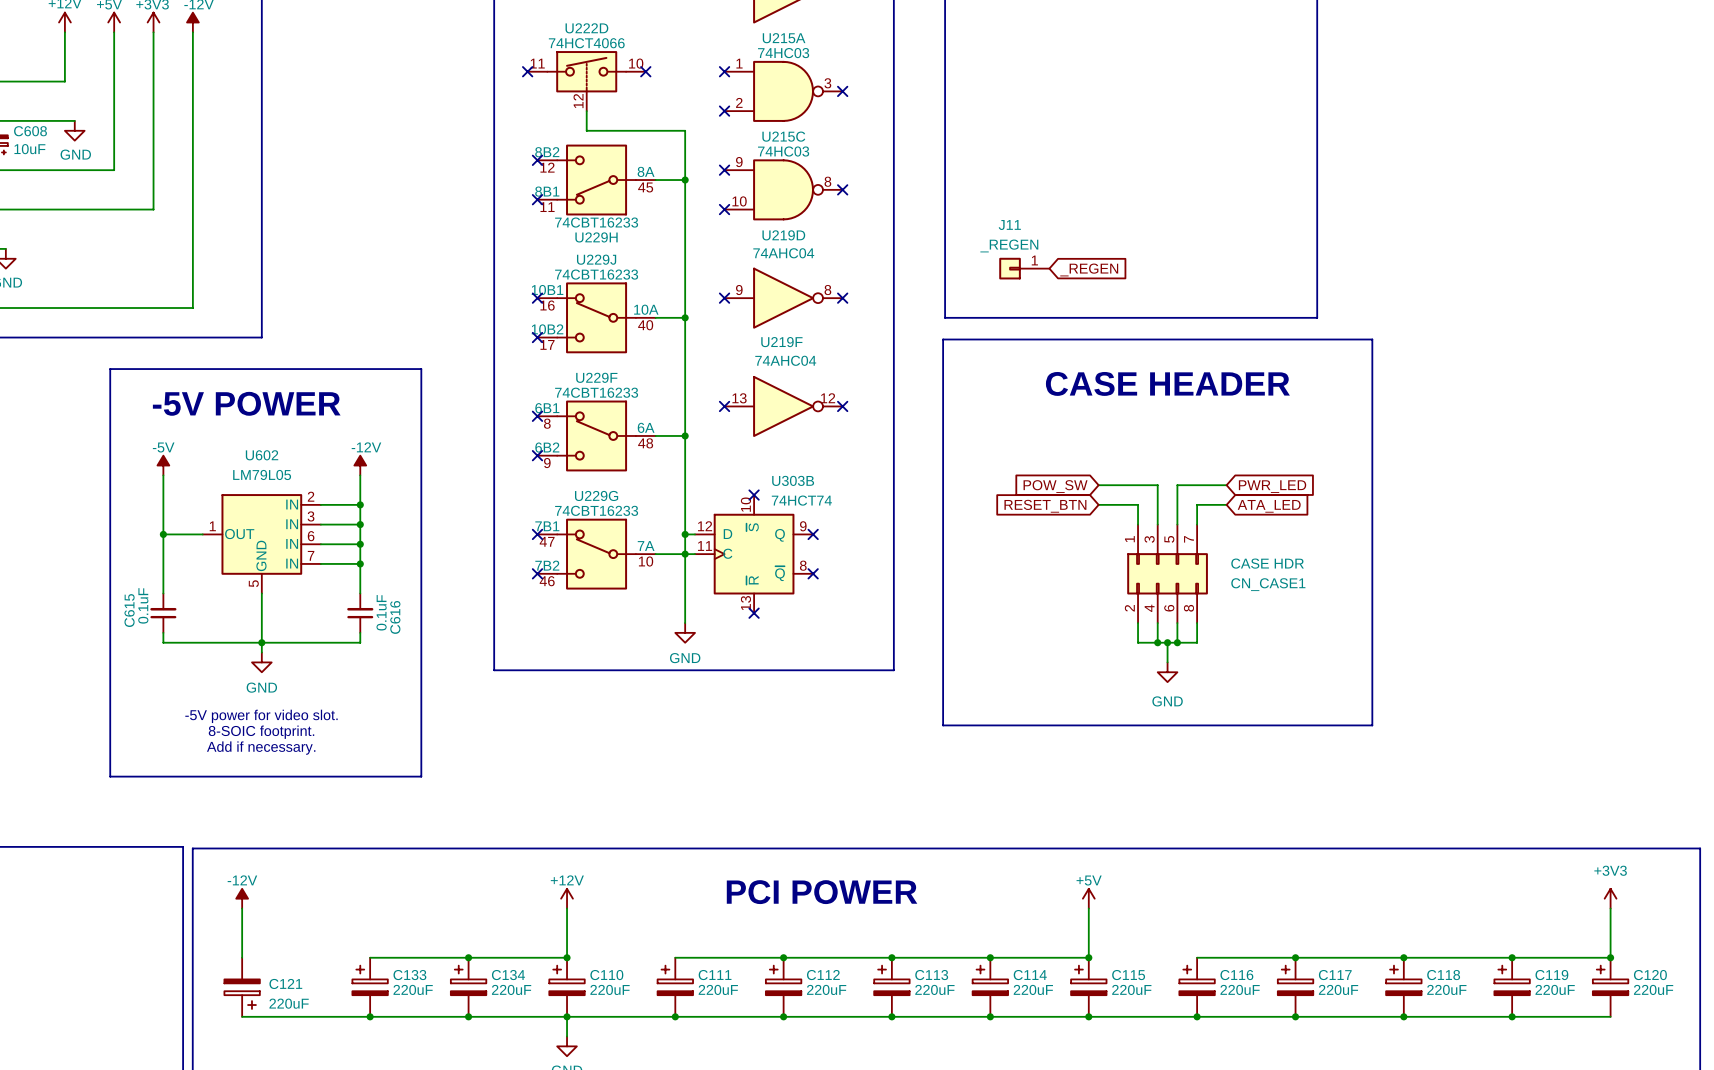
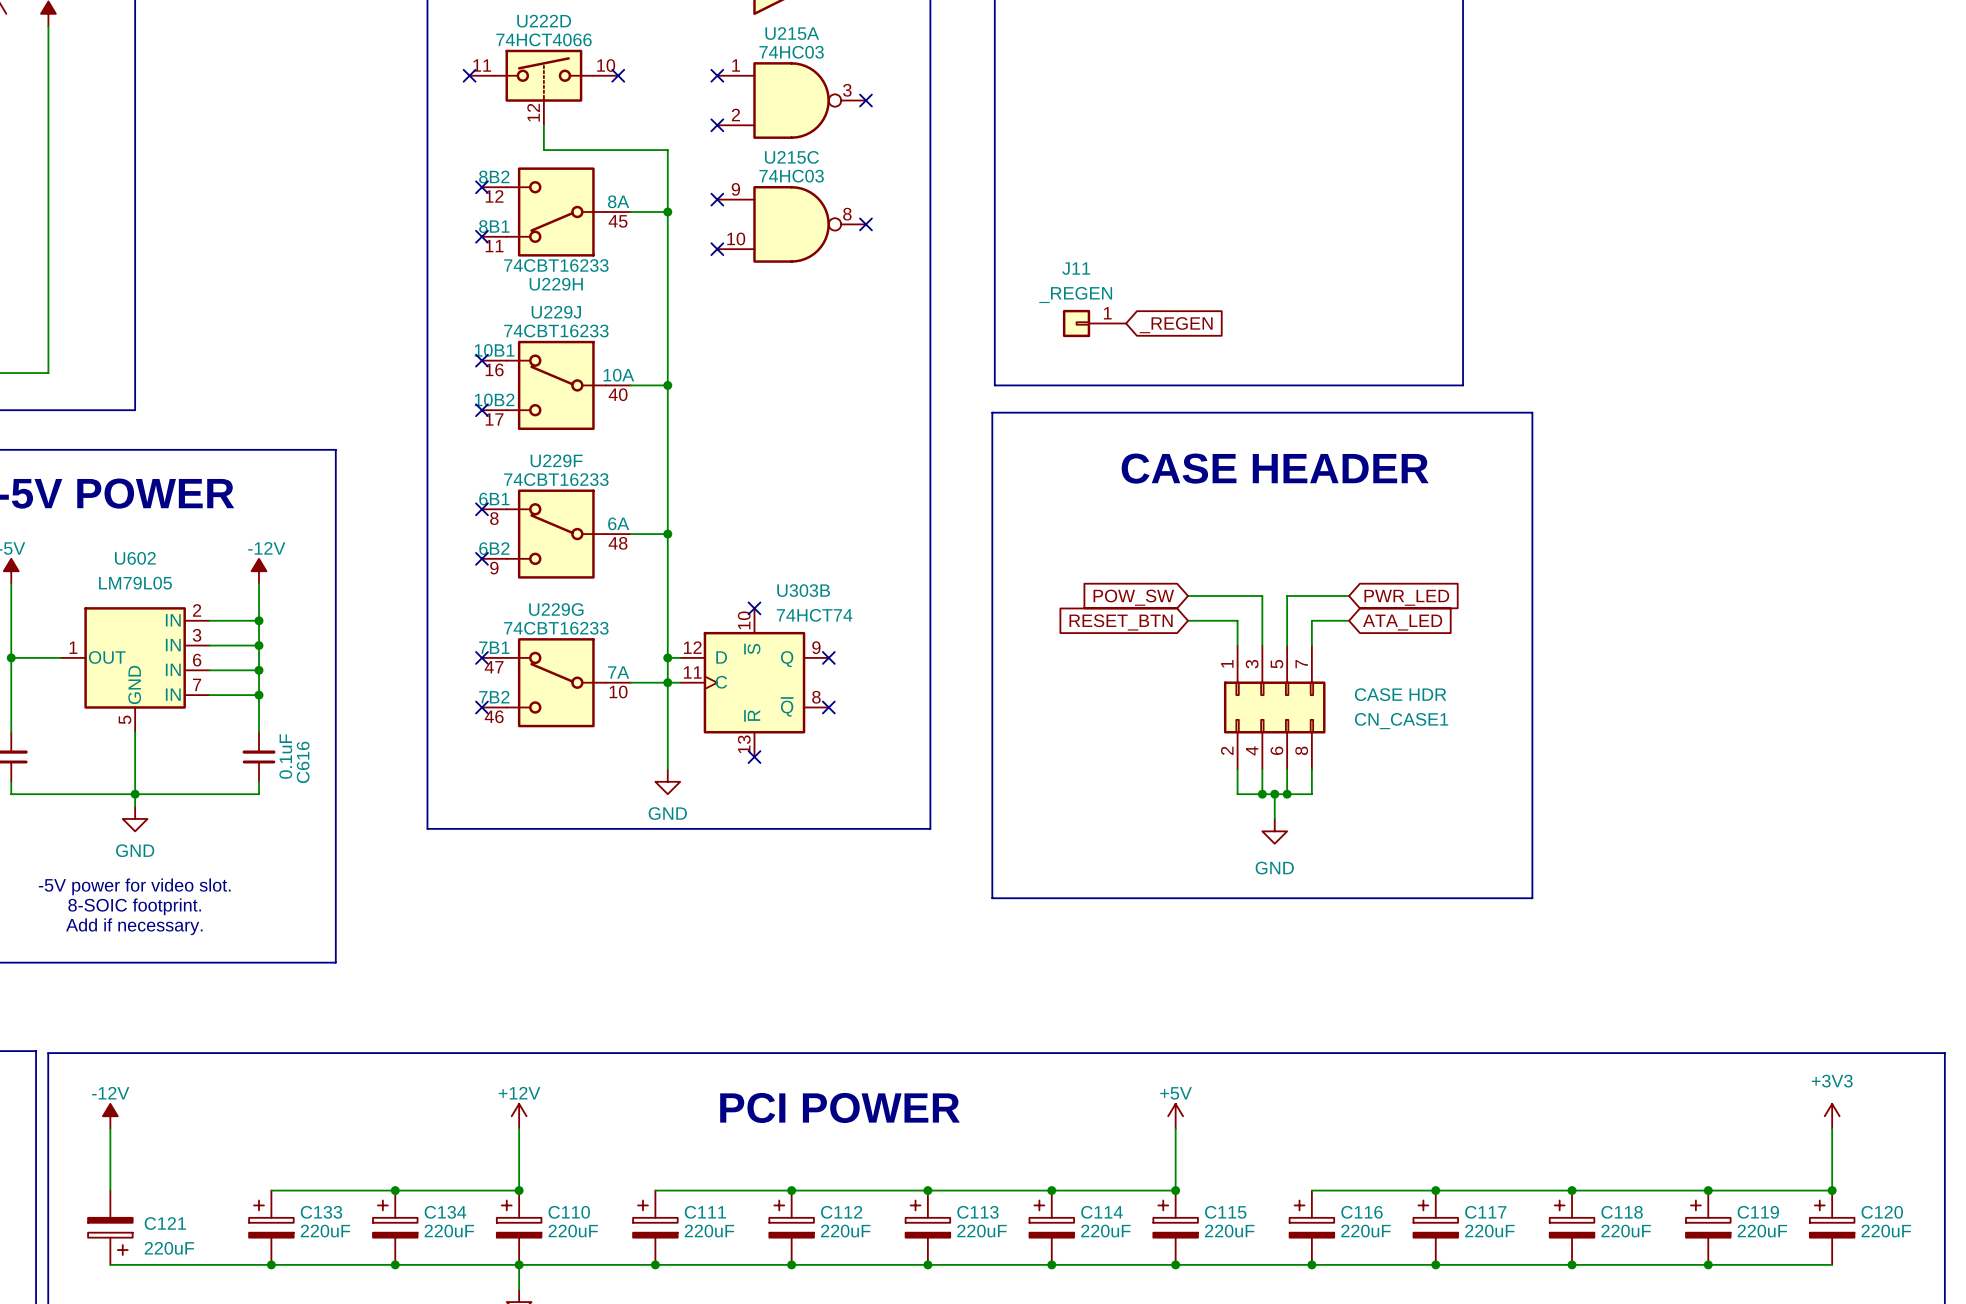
no-connect mark: (724, 298) -> none
U219D: 74AHC04 (783, 298) -> none
no-connect mark: (842, 298) -> none
no-connect mark: (724, 406) -> none
U219F: 74AHC04 (783, 406) -> none
no-connect mark: (842, 406) -> none

